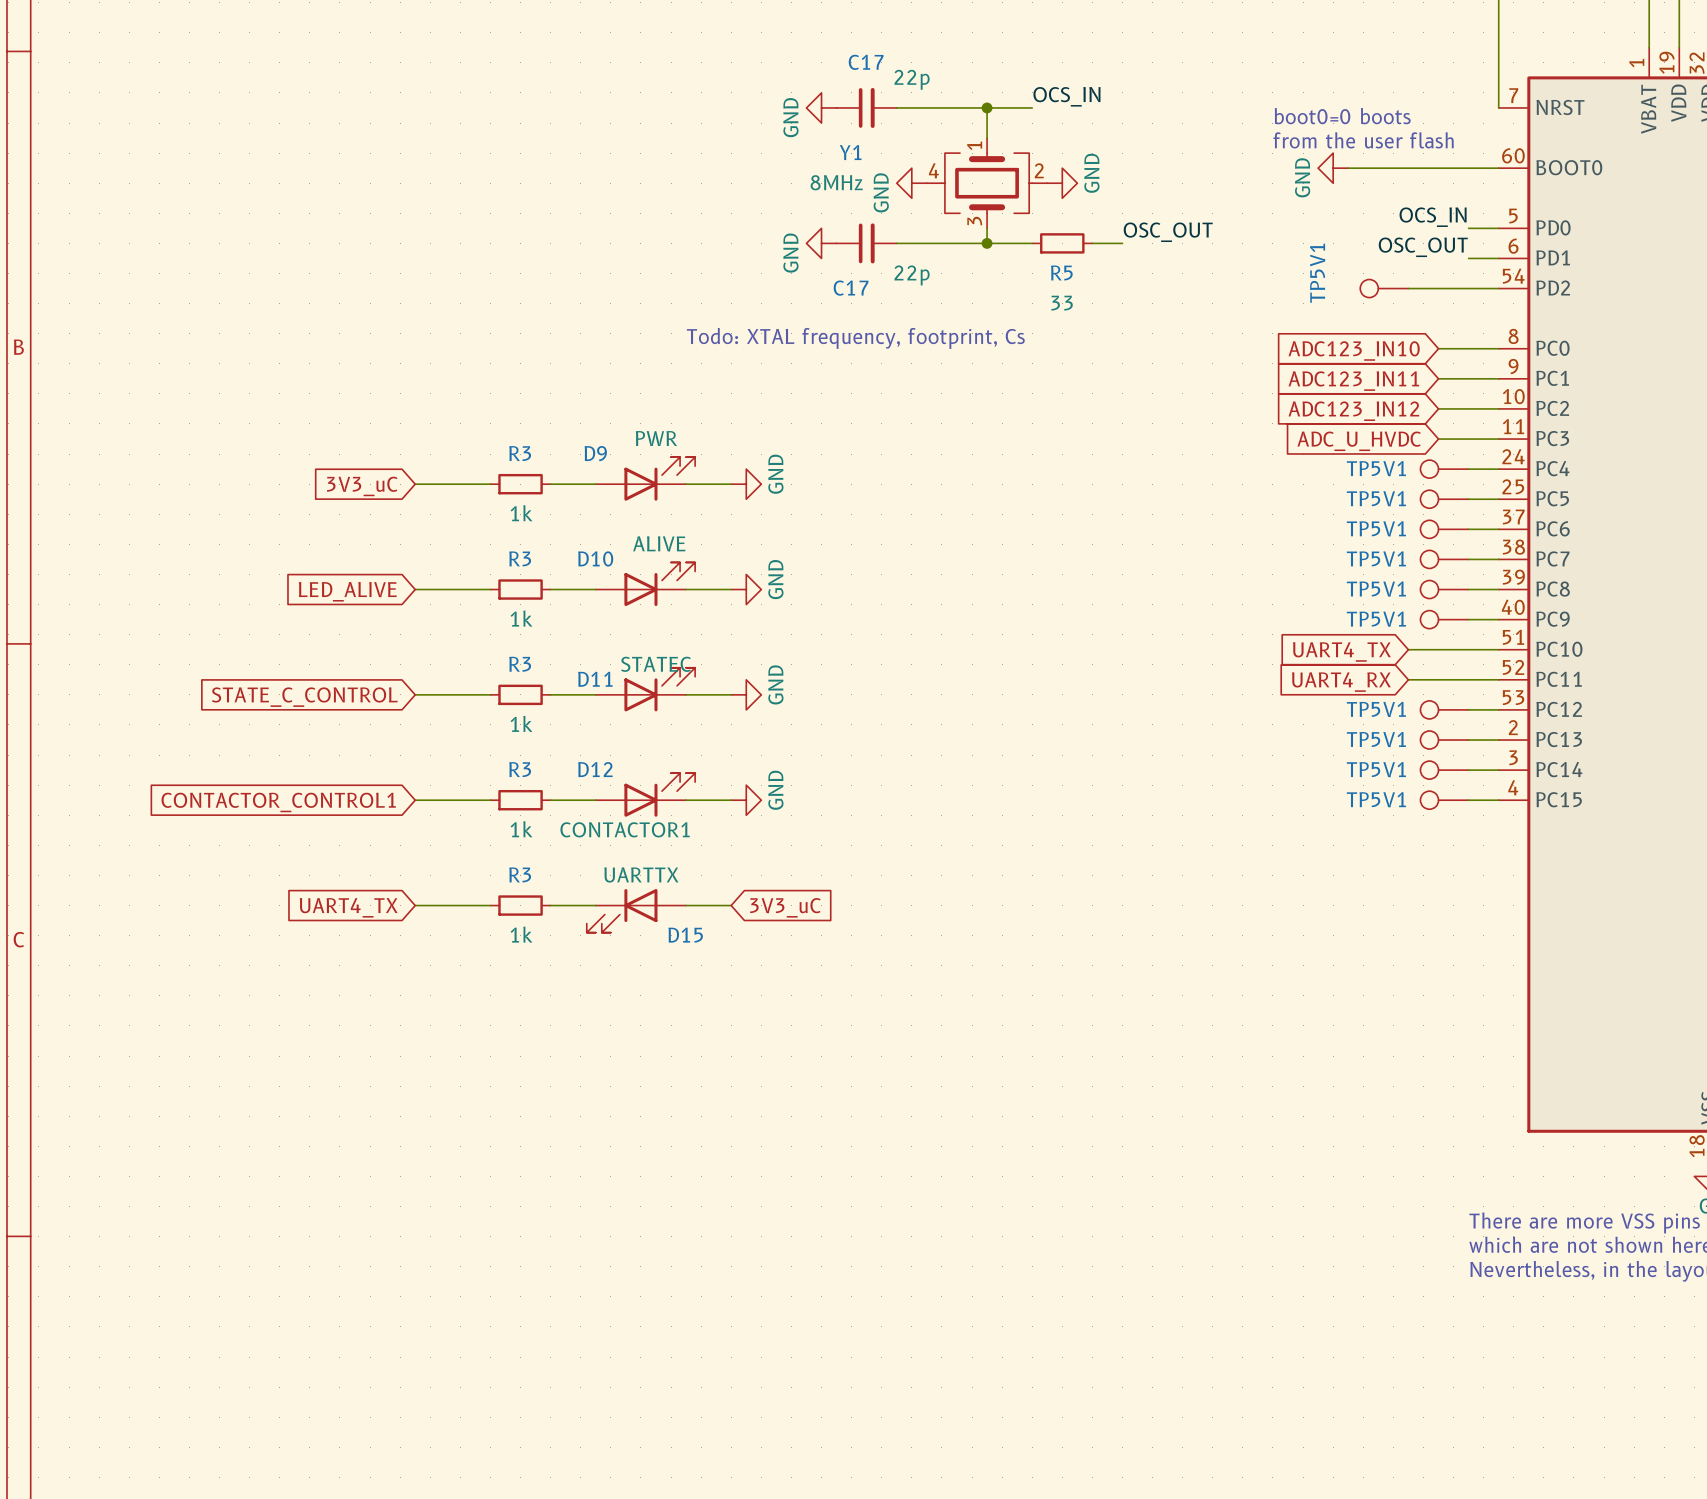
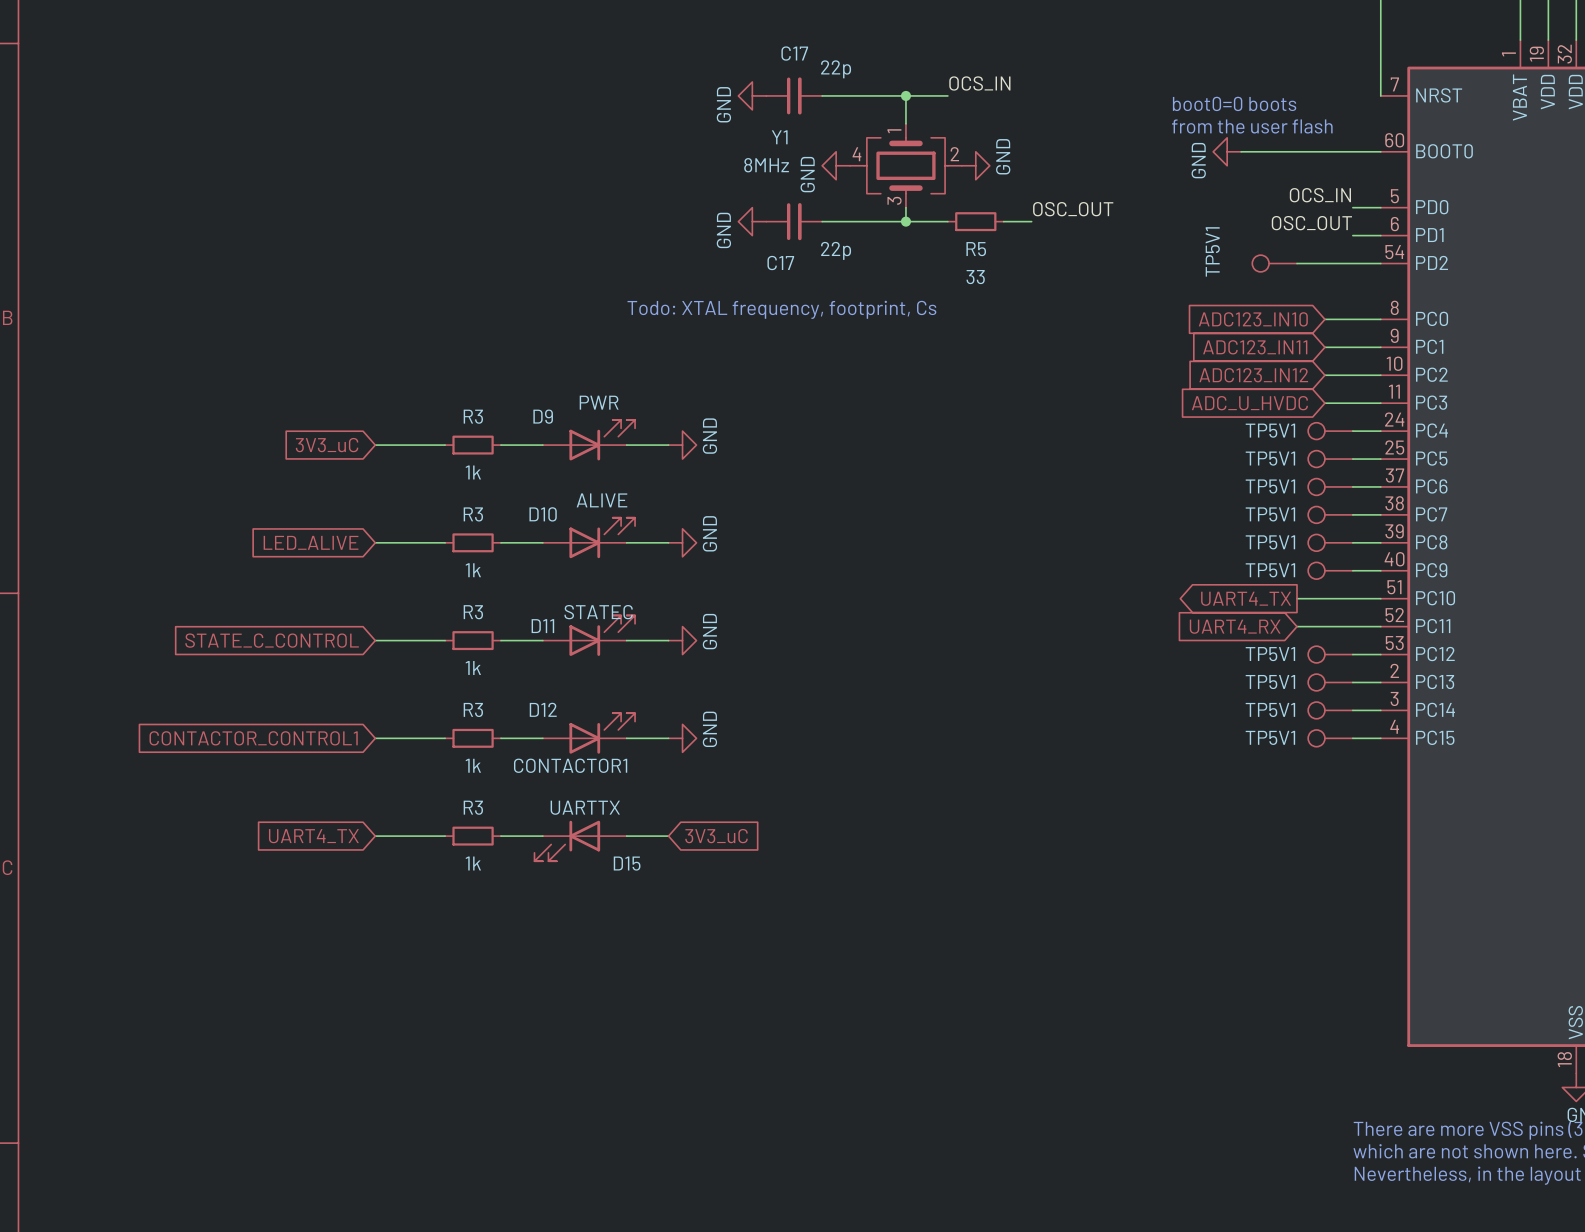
global label shape: input (1341, 651) -> output (1246, 598)

